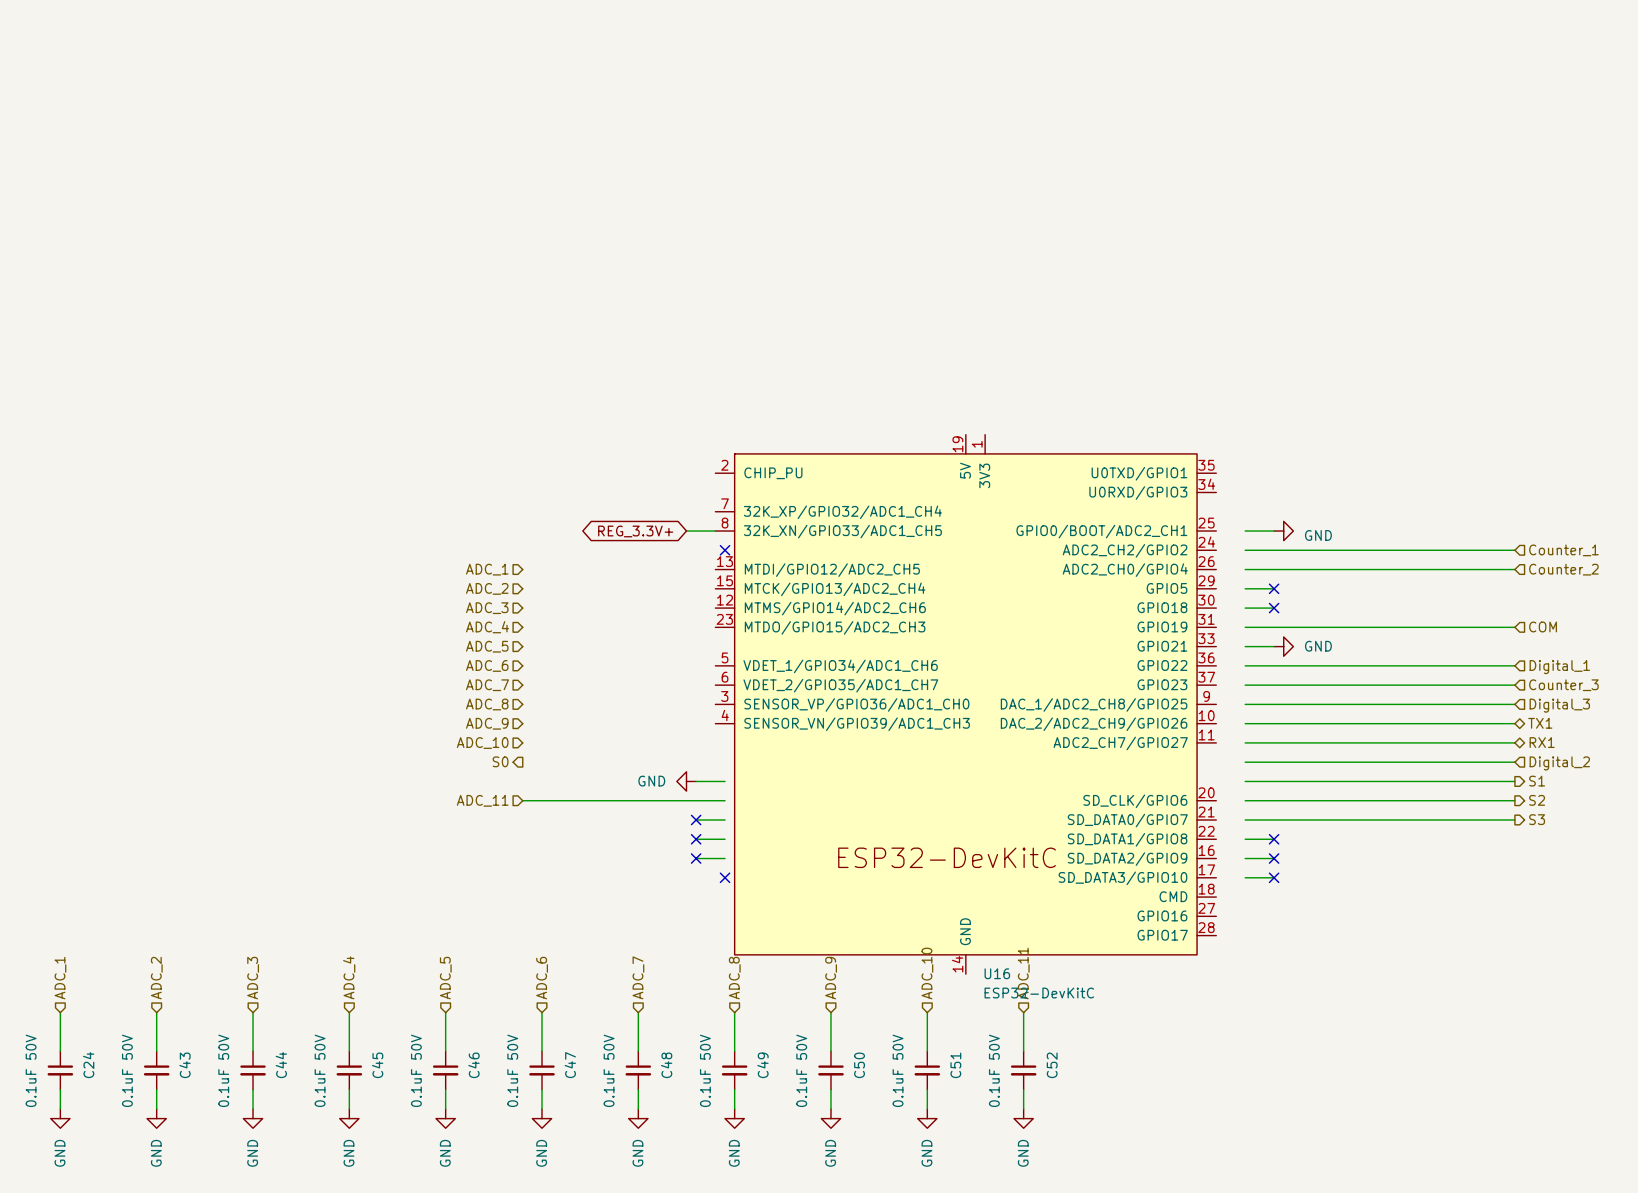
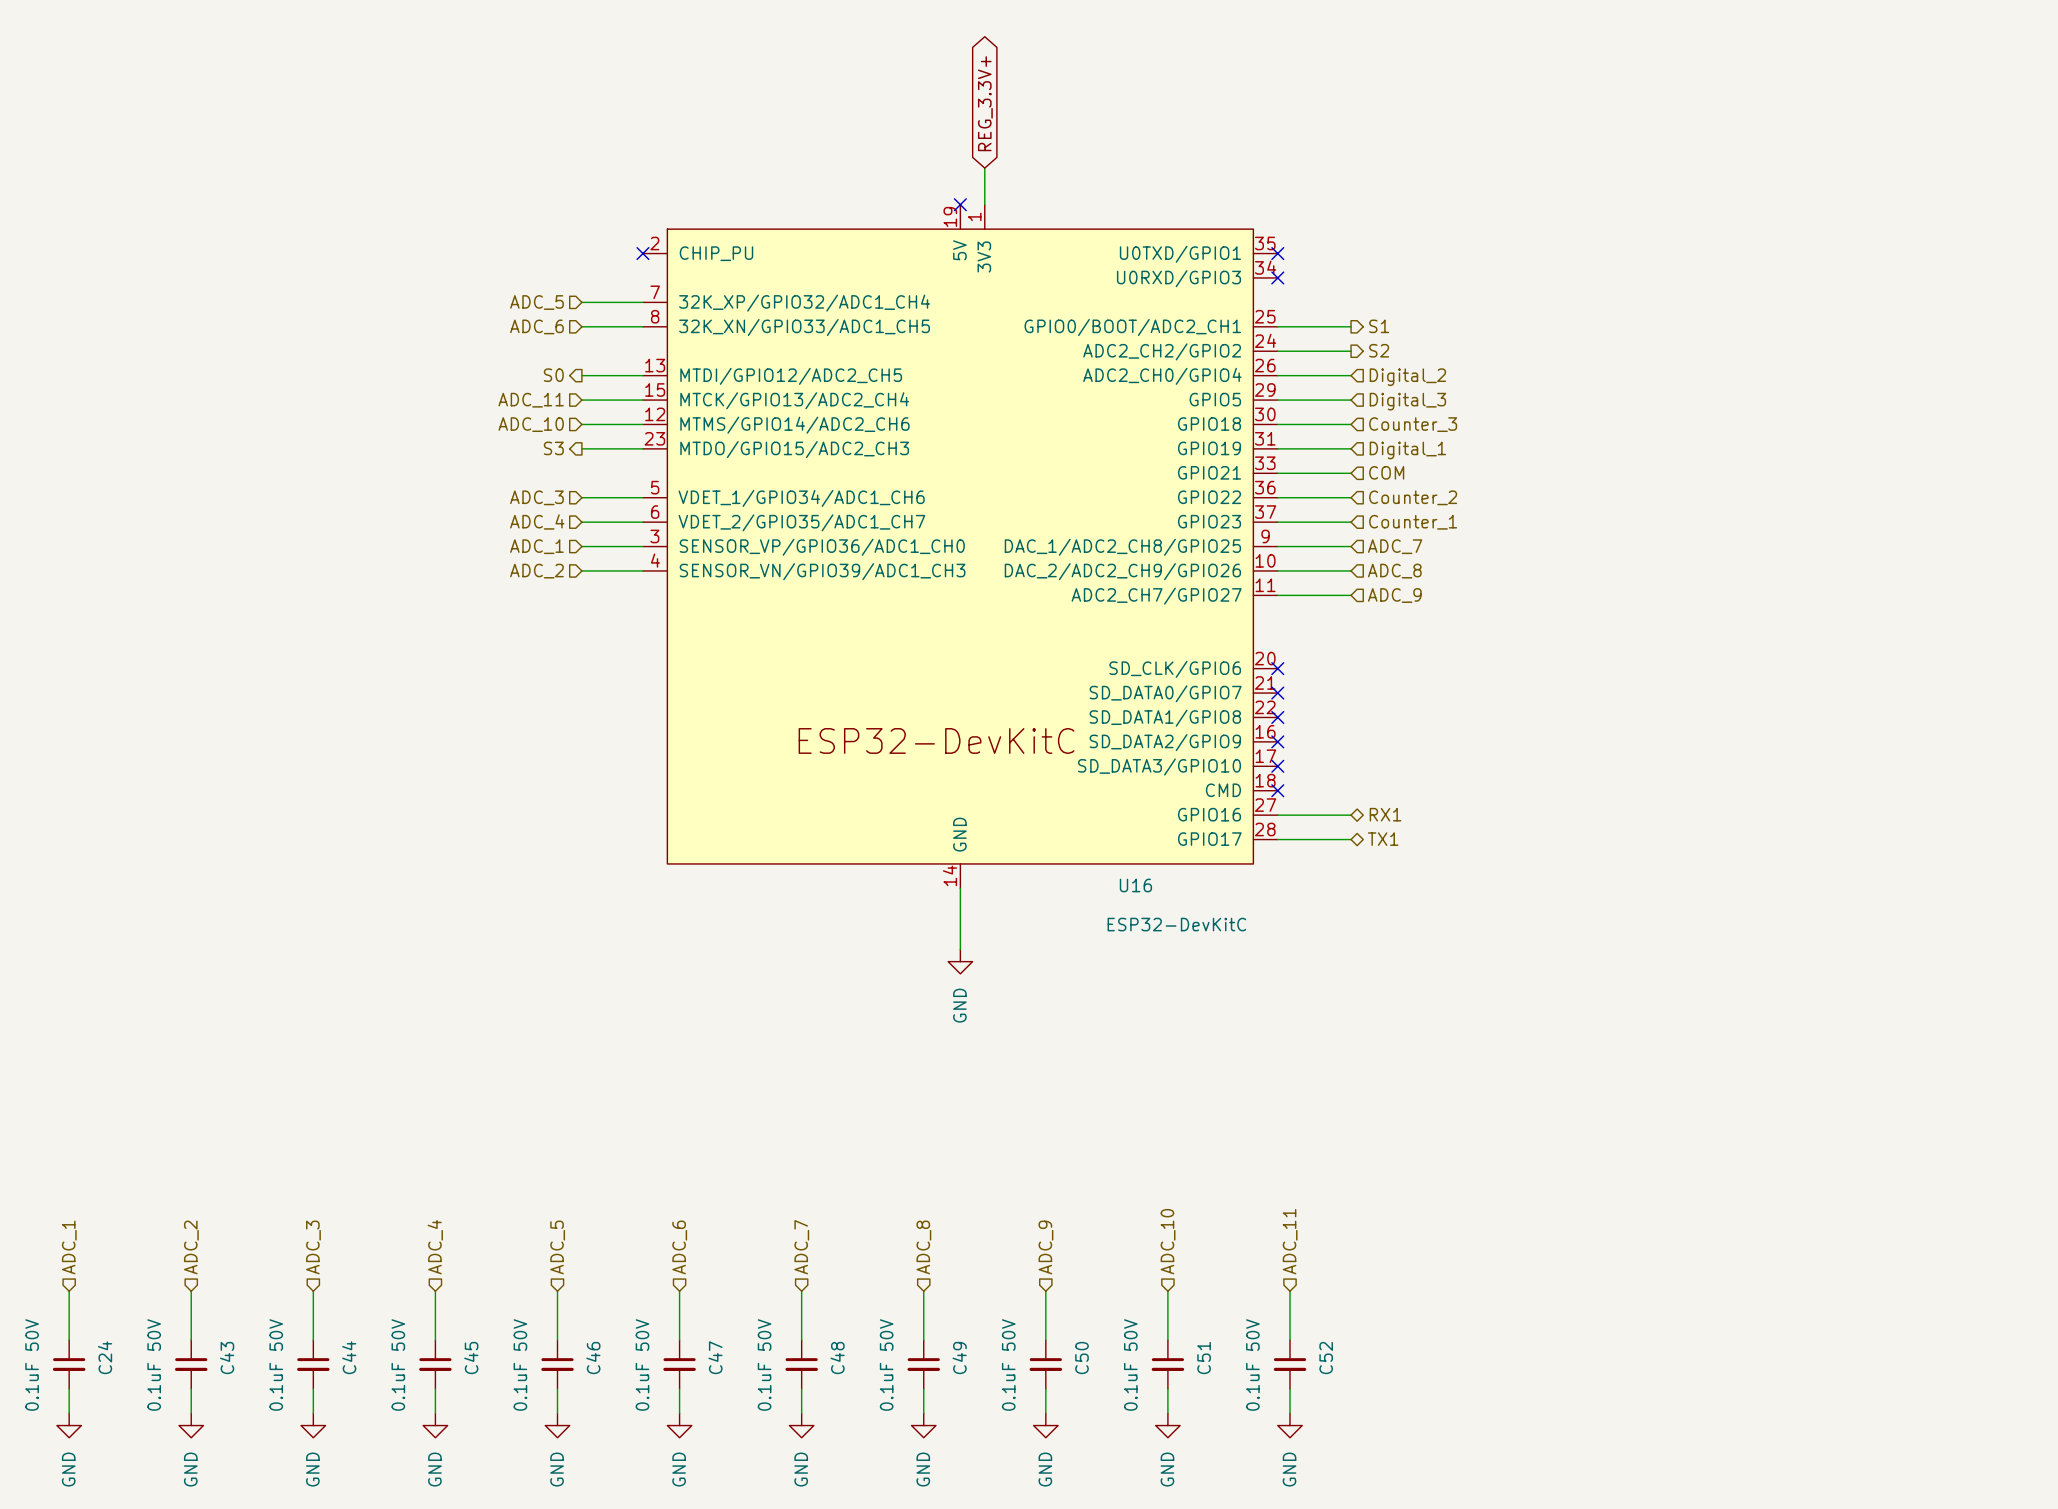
global label: none -> REG_3.3V+ (985, 103)
wire: none -> (984, 168) (984, 204)
no-connect mark: none -> (960, 204)
no-connect mark: none -> (642, 253)
no-connect mark: none -> (1277, 253)
no-connect mark: none -> (1277, 277)
hierarchical label: none -> ADC_5 (536, 302)
wire: none -> (581, 302) (642, 302)
hierarchical label: none -> ADC_6 (536, 326)
wire: none -> (581, 326) (642, 326)
wire: none -> (1277, 326) (1351, 326)
hierarchical label: none -> S1 (1379, 326)
wire: none -> (1277, 351) (1351, 351)
hierarchical label: none -> S2 (1379, 350)
hierarchical label: none -> S0 (553, 375)
wire: none -> (581, 375) (642, 375)
wire: none -> (1277, 375) (1351, 375)
hierarchical label: none -> Digital_2 (1407, 377)
hierarchical label: none -> ADC_11 (531, 400)
wire: none -> (581, 400) (642, 400)
wire: none -> (1277, 400) (1351, 400)
hierarchical label: none -> Digital_3 (1407, 401)
hierarchical label: none -> ADC_10 (531, 424)
wire: none -> (581, 424) (642, 424)
wire: none -> (1277, 424) (1351, 424)
hierarchical label: none -> Counter_3 (1413, 424)
hierarchical label: none -> S3 (553, 448)
wire: none -> (581, 448) (642, 448)
wire: none -> (1277, 448) (1351, 448)
hierarchical label: none -> Digital_1 (1407, 450)
hierarchical label: none -> COM (1386, 472)
wire: none -> (1277, 473) (1351, 473)
hierarchical label: none -> ADC_3 (536, 497)
wire: none -> (581, 497) (642, 497)
wire: none -> (1277, 497) (1351, 497)
hierarchical label: none -> Counter_2 (1413, 497)
hierarchical label: none -> ADC_4 (537, 521)
wire: none -> (581, 522) (642, 522)
wire: none -> (1277, 522) (1351, 522)
hierarchical label: none -> Counter_1 (1413, 522)
wire: none -> (581, 546) (642, 546)
wire: none -> (1277, 546) (1351, 546)
hierarchical label: none -> ADC_7 (1395, 546)
wire: none -> (581, 570) (642, 570)
wire: none -> (1277, 570) (1351, 570)
hierarchical label: none -> ADC_8 (1394, 571)
hierarchical label: none -> ADC_9 (1394, 595)
no-connect mark: none -> (1277, 668)
global label: REG_3.3V+ (635, 531) -> none
wire: (1245, 531) (1274, 531) -> none
power symbol: GND (1283, 531) -> none
no-connect mark: none -> (1277, 693)
no-connect mark: (725, 550) -> none
wire: (1245, 550) (1514, 550) -> none
hierarchical label: Counter_1 (1563, 550) -> none
no-connect mark: none -> (1277, 717)
hierarchical label position: ADC_1 (487, 569) -> ADC_1 (536, 546)
wire: (1245, 569) (1514, 569) -> none
hierarchical label: Counter_2 (1563, 569) -> none
no-connect mark: none -> (1277, 741)
hierarchical label position: ADC_2 (487, 588) -> ADC_2 (536, 571)
wire: (1245, 588) (1274, 588) -> none
no-connect mark: (1274, 588) -> none
no-connect mark: none -> (1277, 766)
hierarchical label: ADC_3 (487, 608) -> none
wire: (1245, 608) (1274, 608) -> none
no-connect mark: (1274, 608) -> none
no-connect mark: none -> (1277, 790)
hierarchical label: COM (1543, 626) -> none
hierarchical label: ADC_4 (487, 627) -> none
wire: (1245, 627) (1514, 627) -> none
hierarchical label: none -> RX1 (1385, 814)
hierarchical label: ADC_5 (487, 646) -> none
wire: (1245, 646) (1274, 646) -> none
power symbol: GND (1283, 646) -> none
hierarchical label: none -> TX1 (1383, 839)
hierarchical label: ADC_6 (487, 665) -> none
wire: (1245, 665) (1514, 665) -> none
hierarchical label: Digital_1 (1559, 667) -> none
hierarchical label: ADC_7 (487, 685) -> none
wire: (1245, 685) (1514, 685) -> none
hierarchical label: Counter_3 (1563, 685) -> none
hierarchical label: ADC_8 (487, 704) -> none
U16 position: (965, 704) -> (960, 546)
wire: (1245, 704) (1514, 704) -> none
hierarchical label: Digital_3 (1559, 705) -> none
hierarchical label: ADC_9 (487, 723) -> none
wire: (1245, 723) (1514, 723) -> none
hierarchical label: TX1 (1540, 723) -> none
wire: (1245, 742) (1514, 742) -> none
hierarchical label: RX1 (1542, 742) -> none
hierarchical label: ADC_10 (482, 743) -> none
hierarchical label: S0 (500, 761) -> none
wire: (1245, 762) (1514, 762) -> none
hierarchical label: Digital_2 (1559, 763) -> none
power symbol rotation: 0° (686, 781) -> 90° counterclockwise (960, 961)
power symbol position: GND (686, 781) -> GND (960, 961)
wire: (696, 781) (725, 781) -> none
wire: (1245, 781) (1514, 781) -> none
hierarchical label: S1 (1537, 781) -> none
hierarchical label: ADC_11 (482, 800) -> none
wire: (522, 800) (725, 800) -> none
wire: (1245, 800) (1514, 800) -> none
hierarchical label: S2 (1537, 800) -> none
wire: (696, 819) (725, 819) -> none
no-connect mark: (696, 819) -> none
wire: (1245, 819) (1514, 819) -> none
hierarchical label: S3 (1537, 819) -> none
wire: (696, 839) (725, 839) -> none
no-connect mark: (696, 839) -> none
wire: (1245, 839) (1274, 839) -> none
no-connect mark: (1274, 839) -> none
wire: (696, 858) (725, 858) -> none
no-connect mark: (696, 858) -> none
wire: (1245, 858) (1274, 858) -> none
no-connect mark: (1274, 858) -> none
no-connect mark: (725, 877) -> none
wire: (1245, 877) (1274, 877) -> none
no-connect mark: (1274, 877) -> none
U16 name position: U16 (997, 973) -> U16 (1135, 885)
U16 value position: ESP32-DevKitC (1039, 993) -> ESP32-DevKitC (1176, 924)

